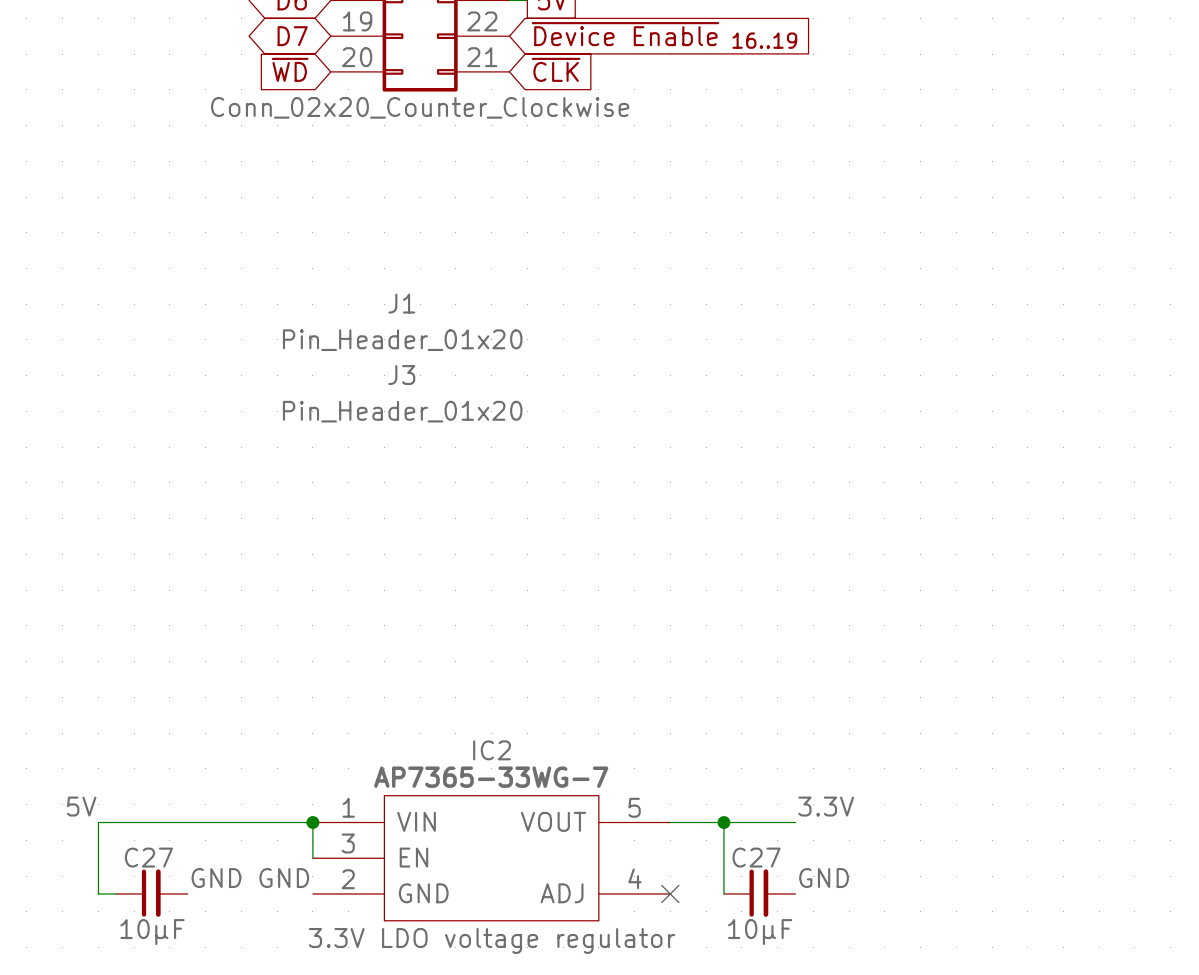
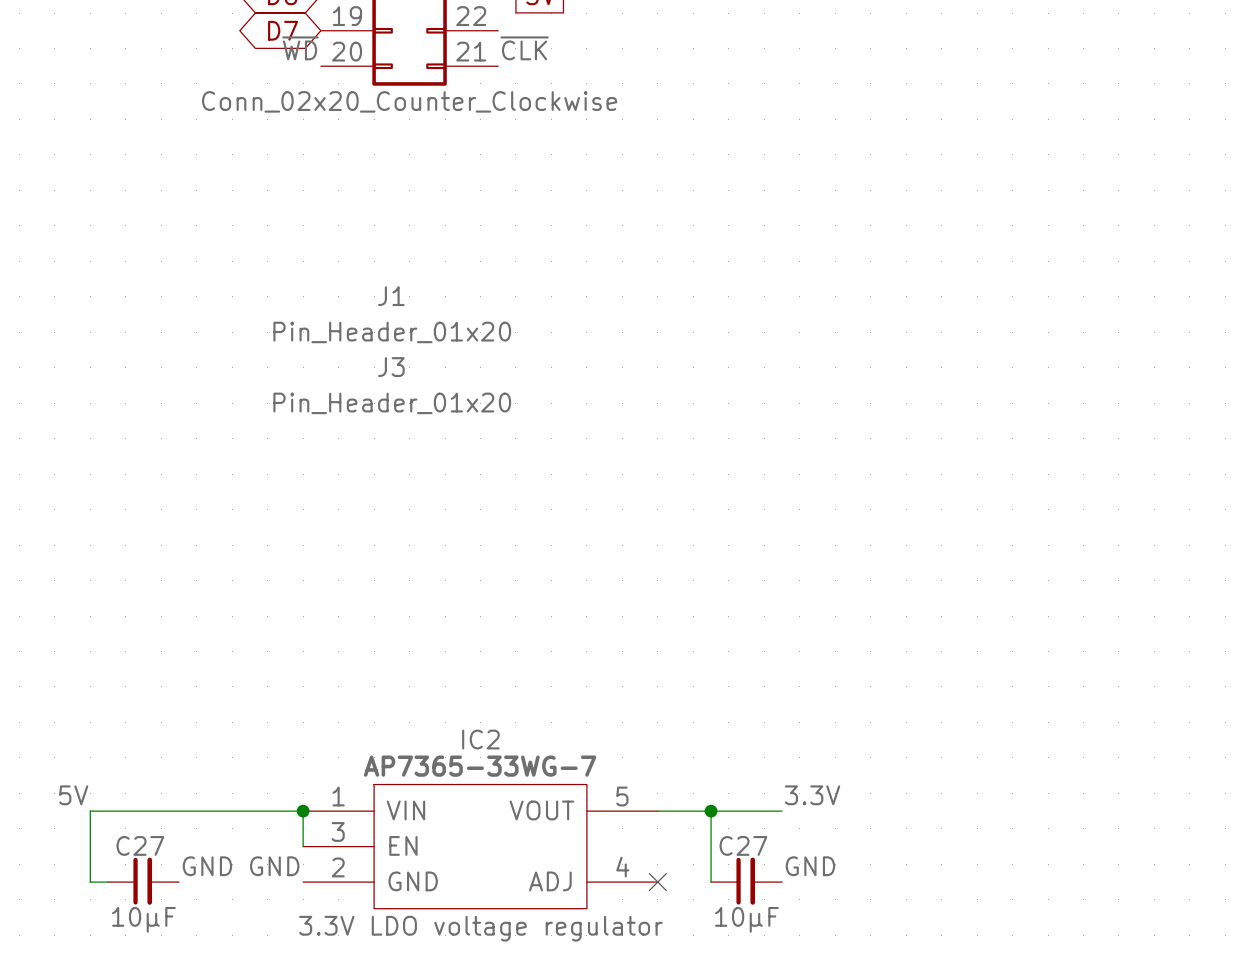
global label: ~{Device Enable} 16..19 (664, 35) -> none
label: none -> ~{WD} (300, 48)
label: none -> ~{CLK} (524, 48)
global label: ~{WD} (290, 69) -> none
global label: ~{CLK} (556, 69) -> none

